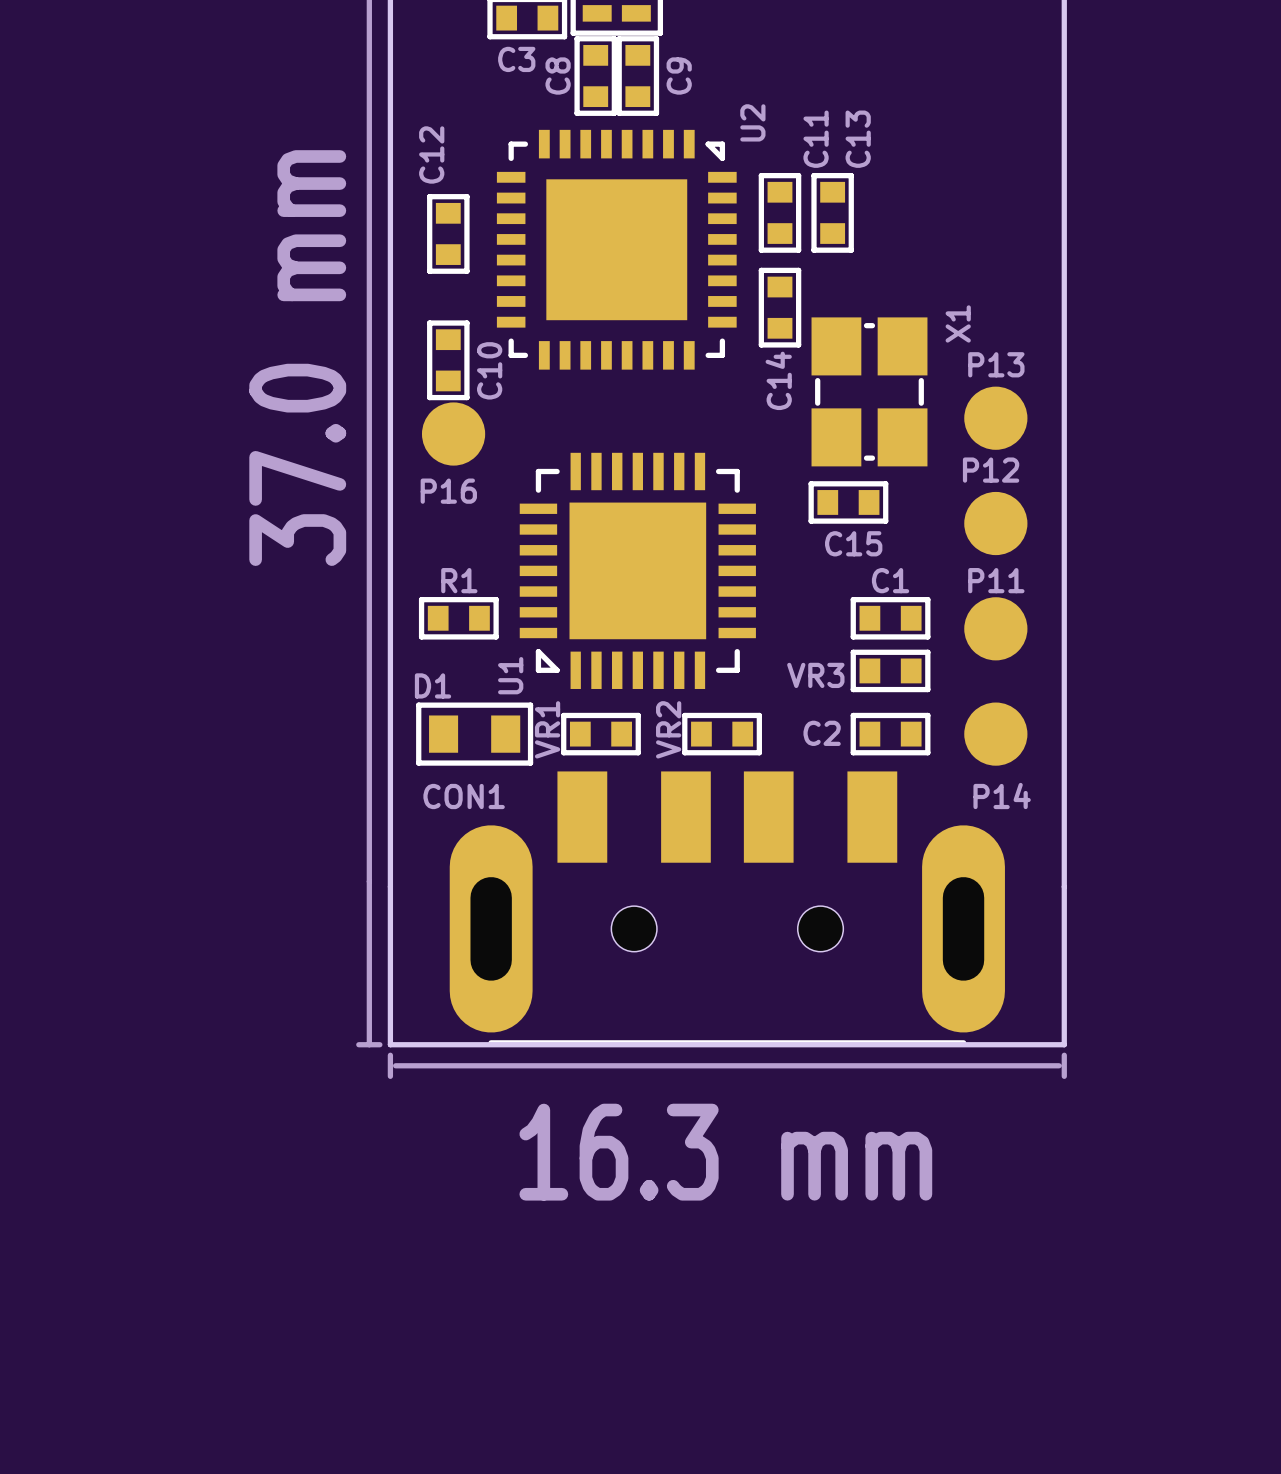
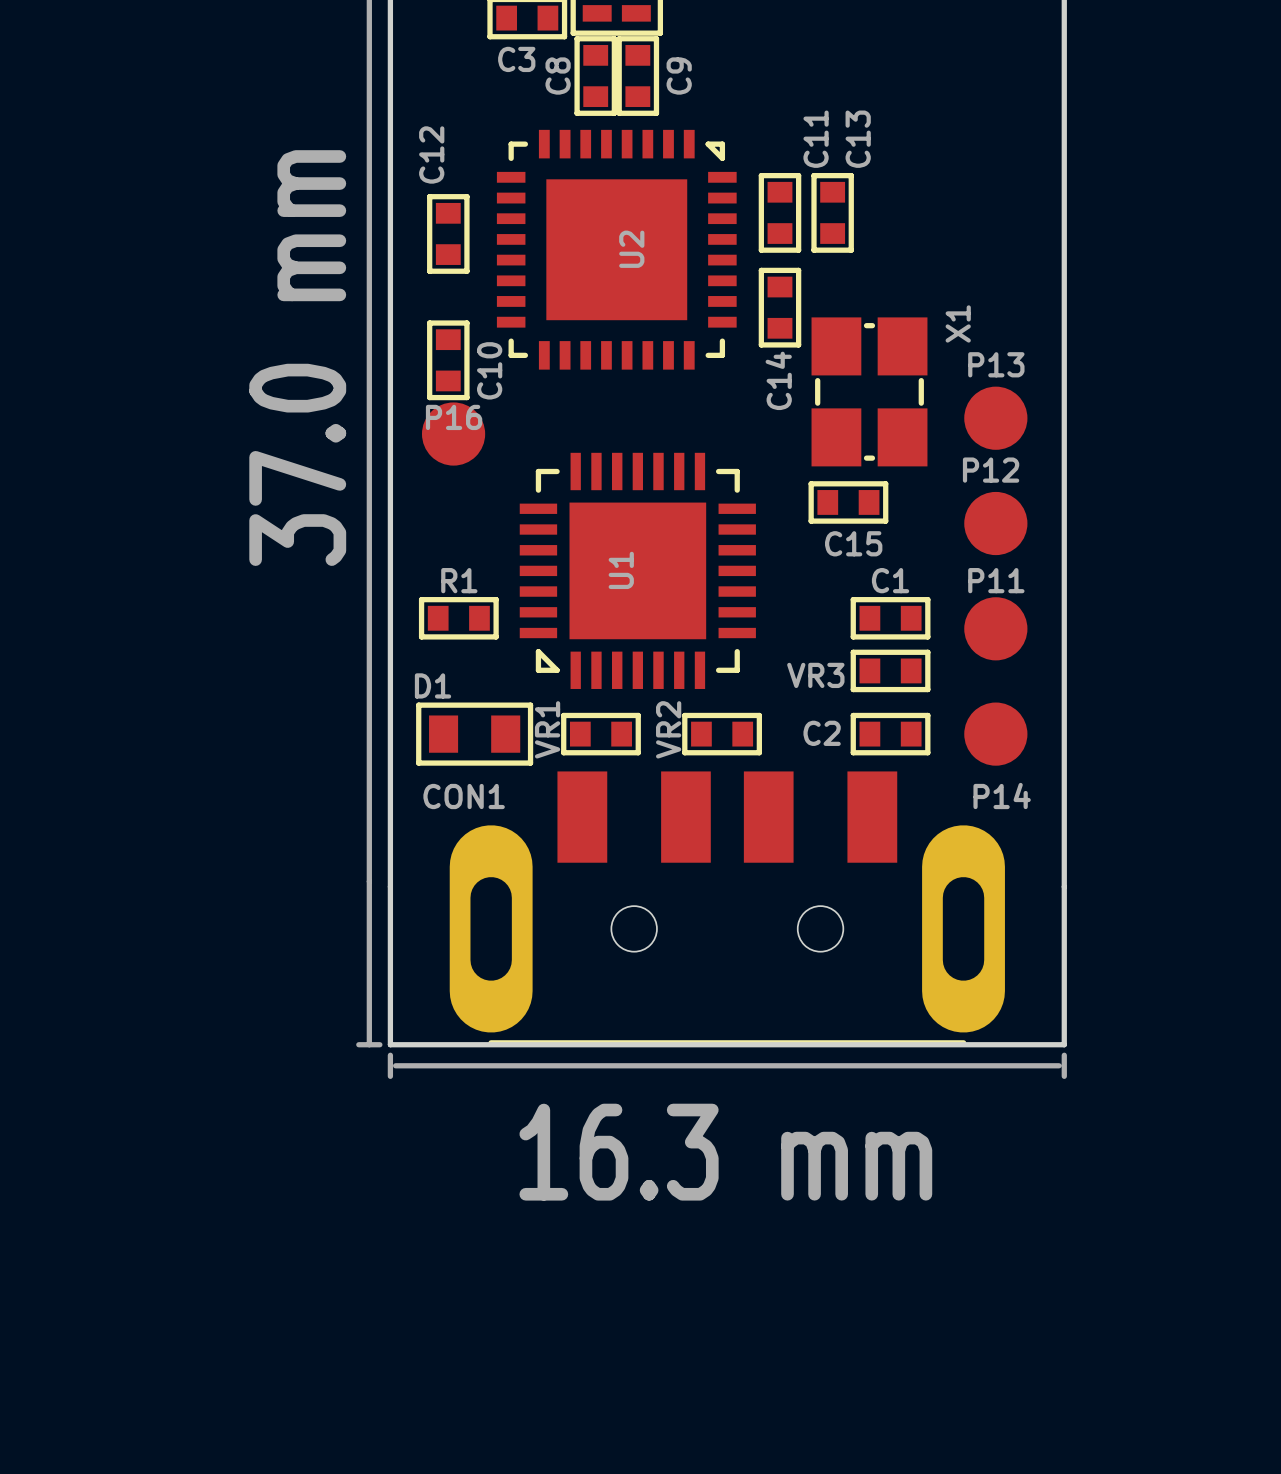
U2 name position: U2 (752, 122) -> U2 (631, 249)
P16 name position: P16 (448, 491) -> P16 (454, 417)
U1 name position: U1 (510, 675) -> U1 (621, 570)

